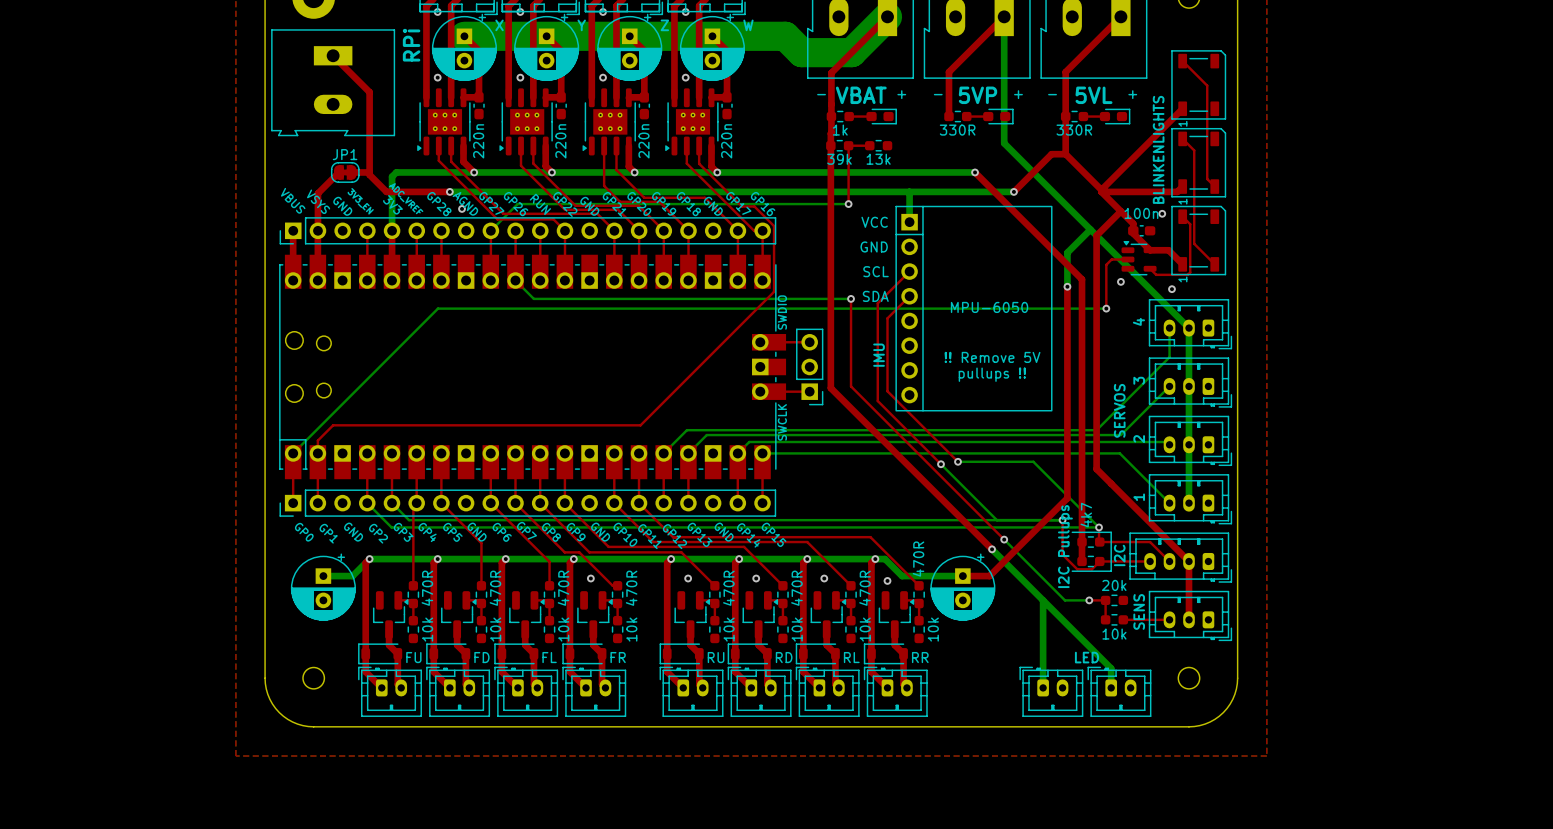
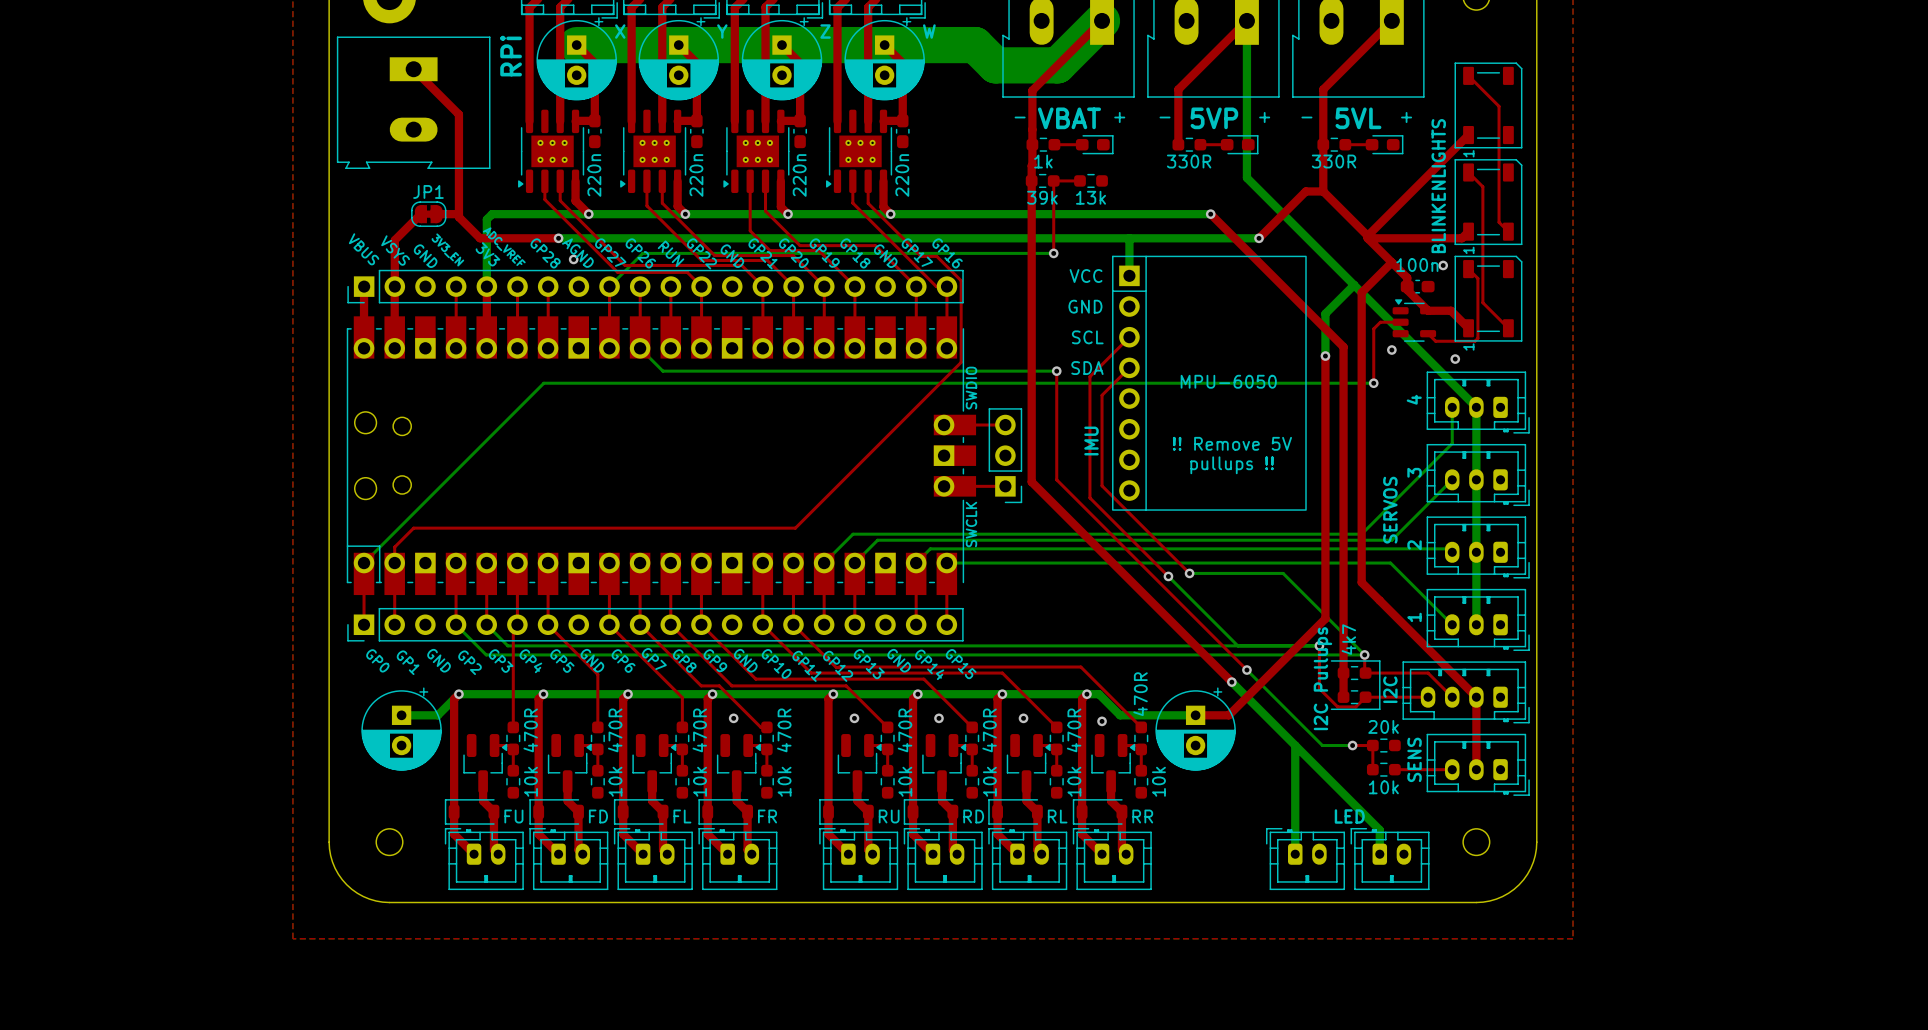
via: (437, 11) -> none
via: (520, 11) -> none
via: (603, 11) -> none
via: (685, 11) -> none
via: (437, 77) -> none
via: (520, 77) -> none
via: (603, 77) -> none
via: (685, 77) -> none

